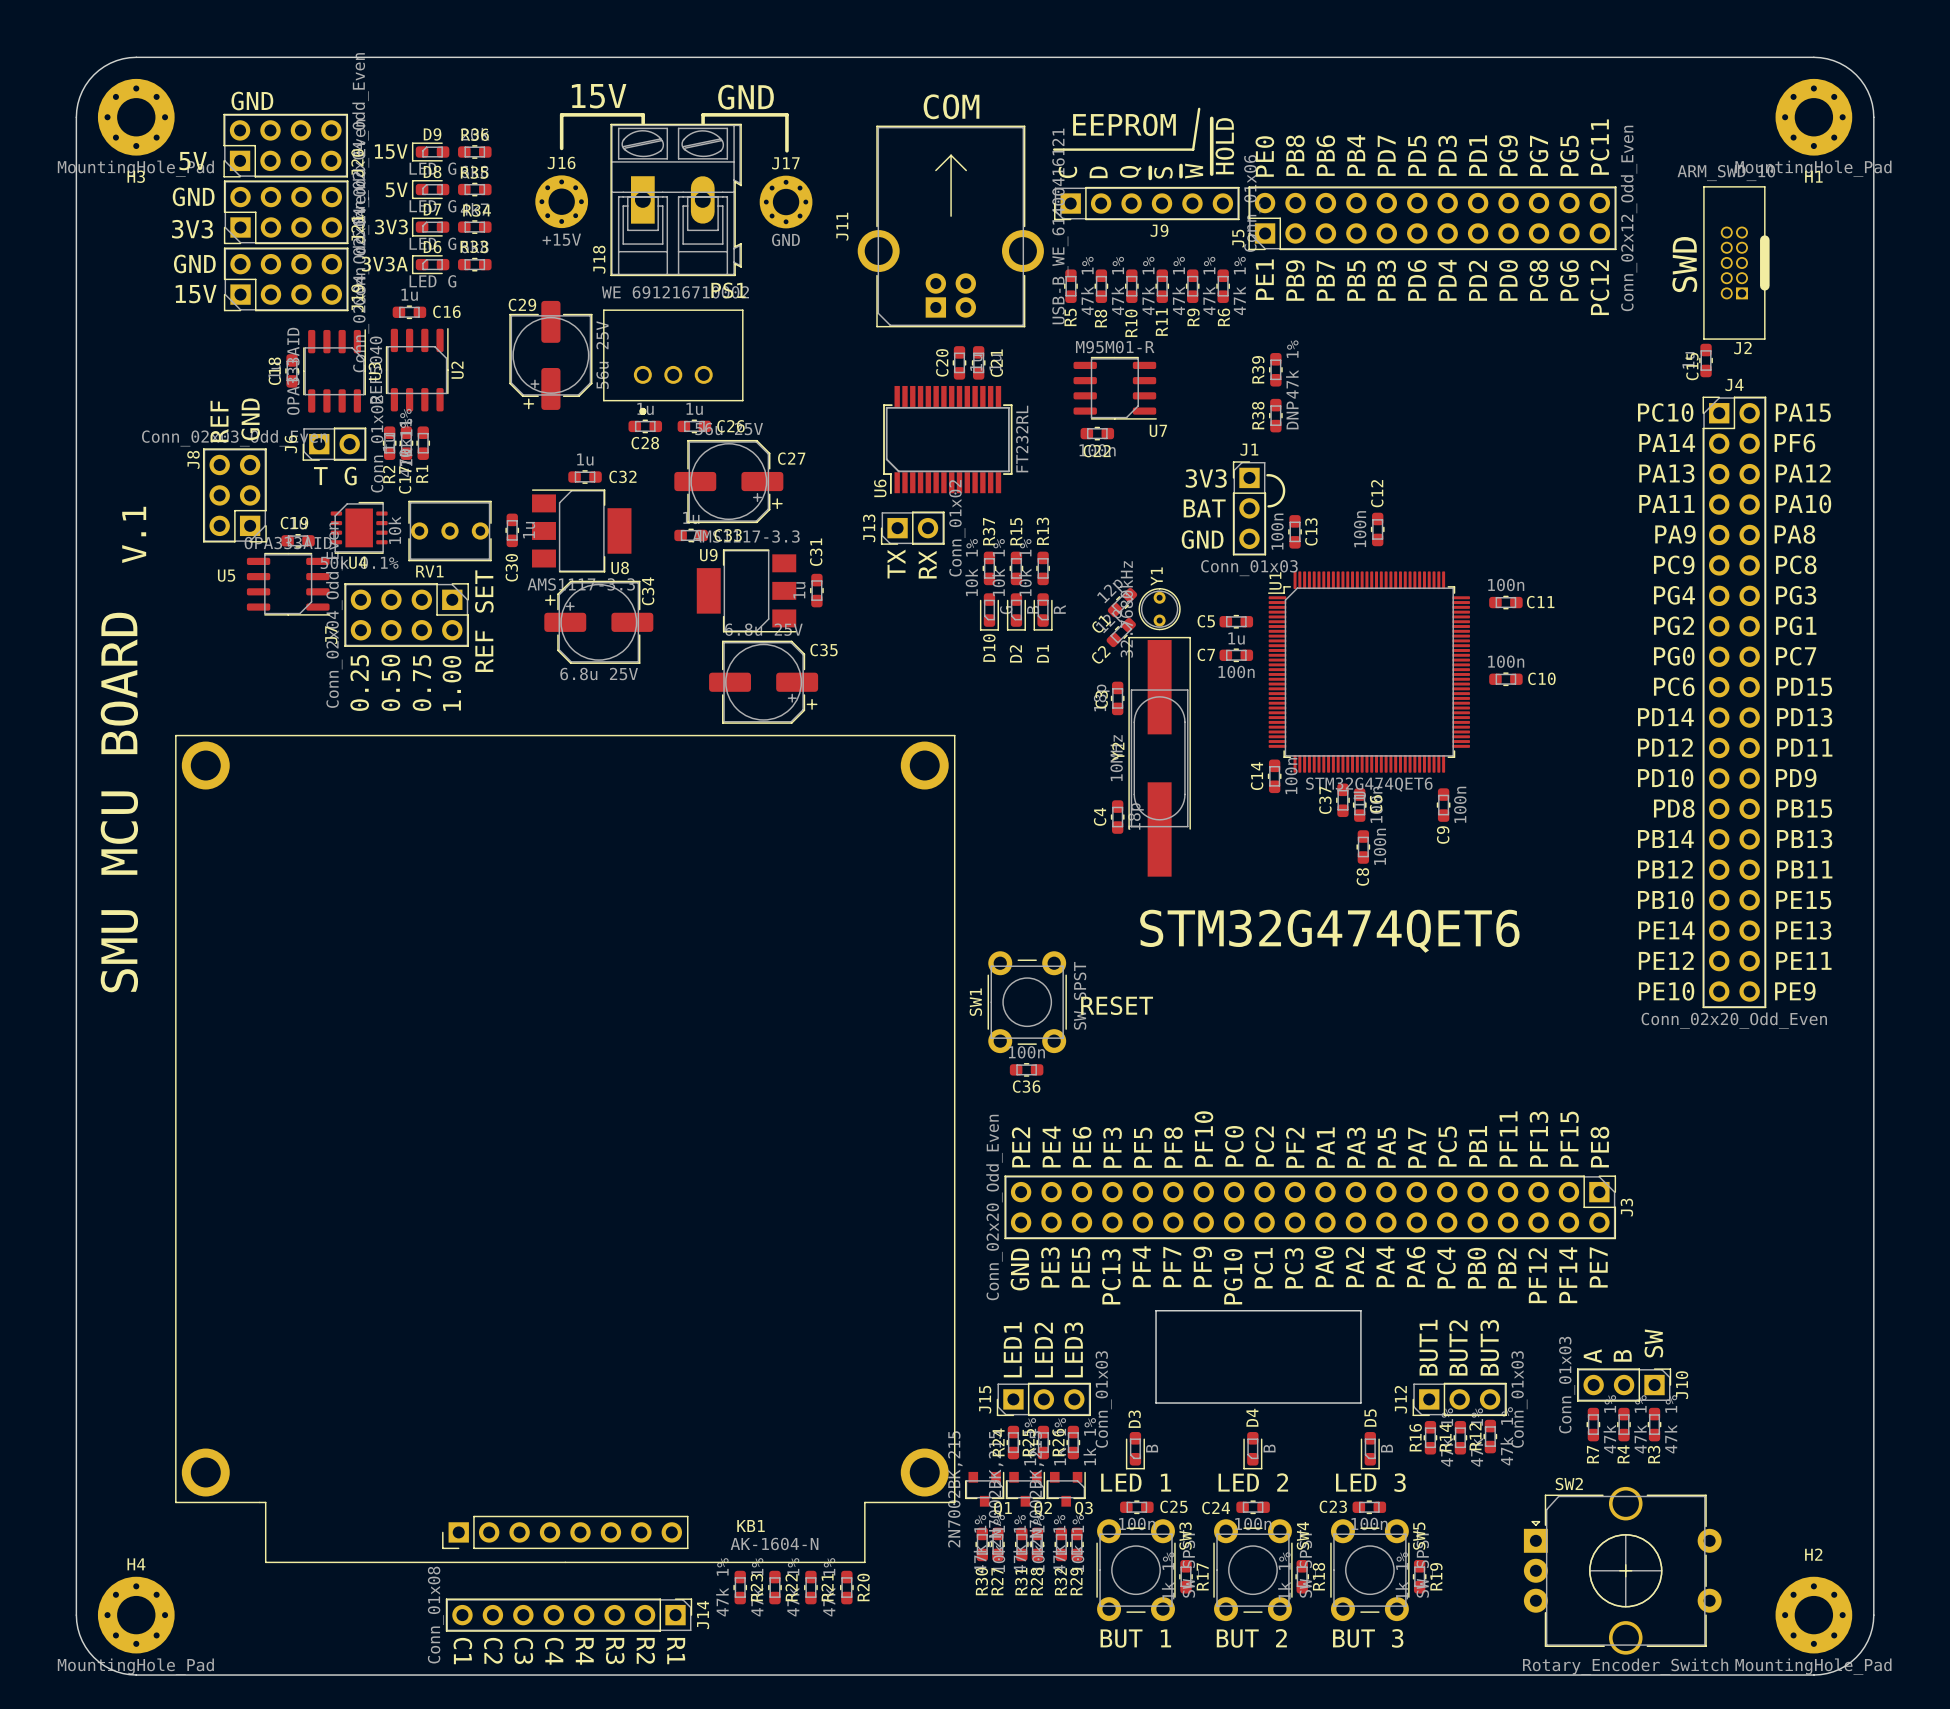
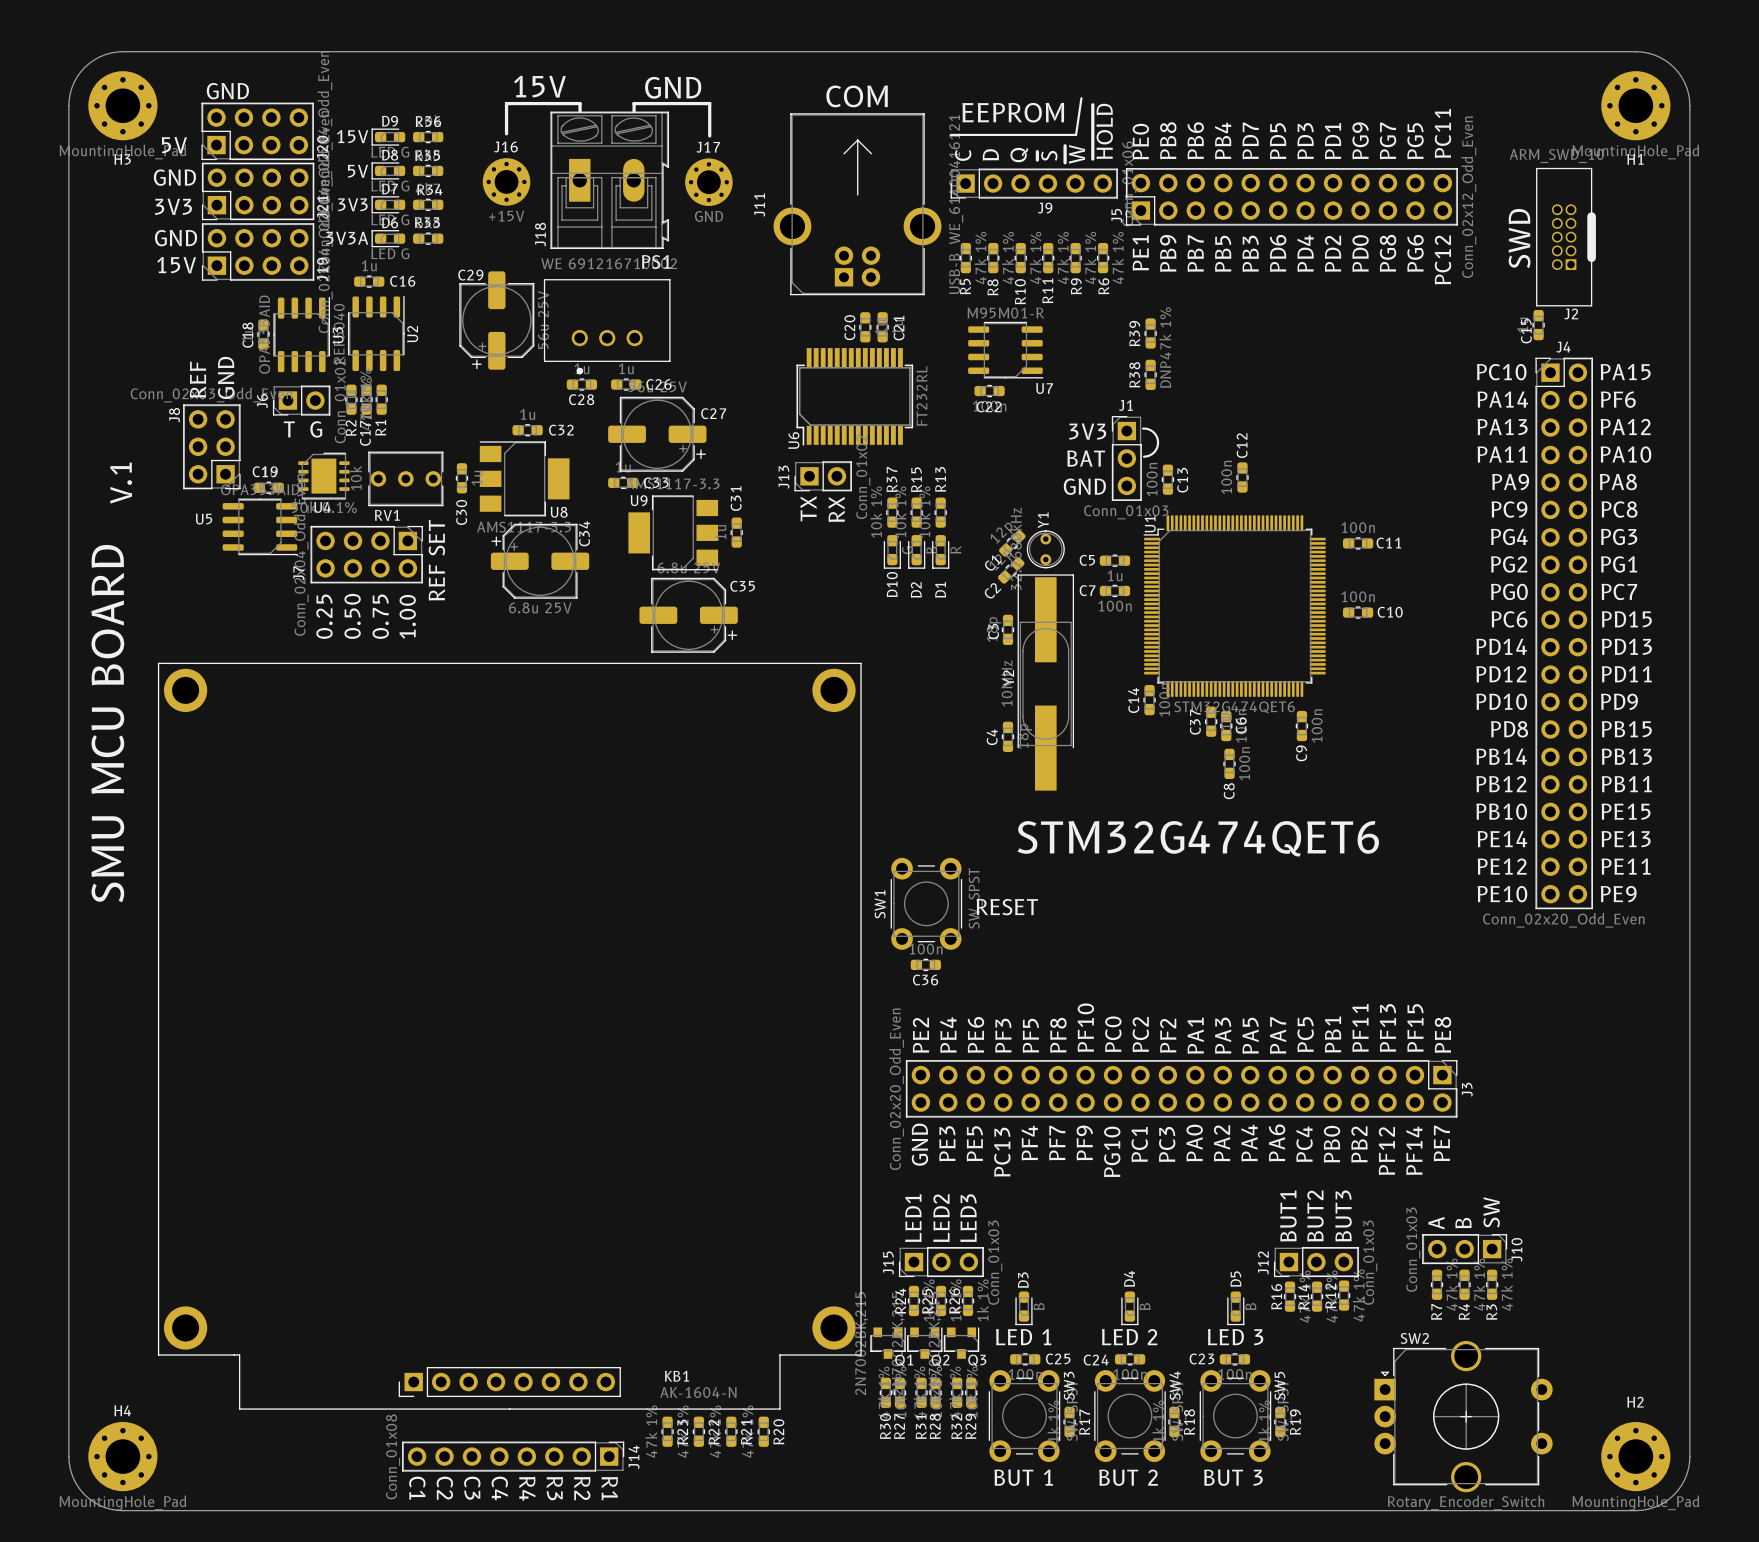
board edge: (1156, 1310) (1360, 1310) (1360, 1403) (1156, 1403) (1156, 1310) -> none

